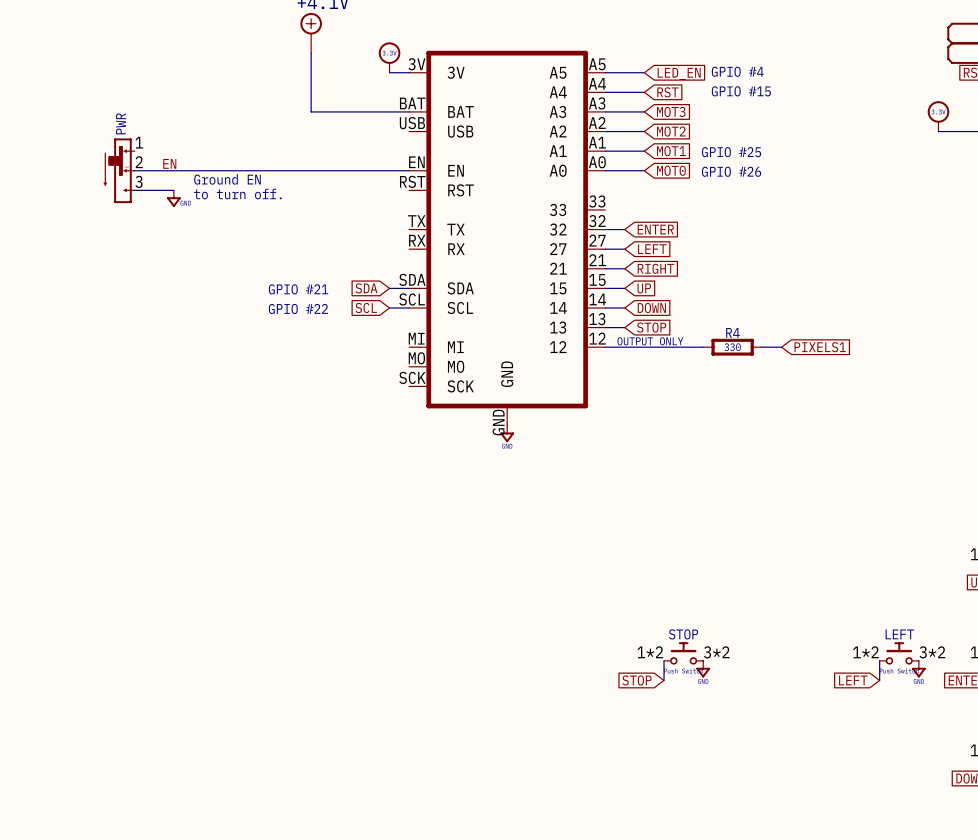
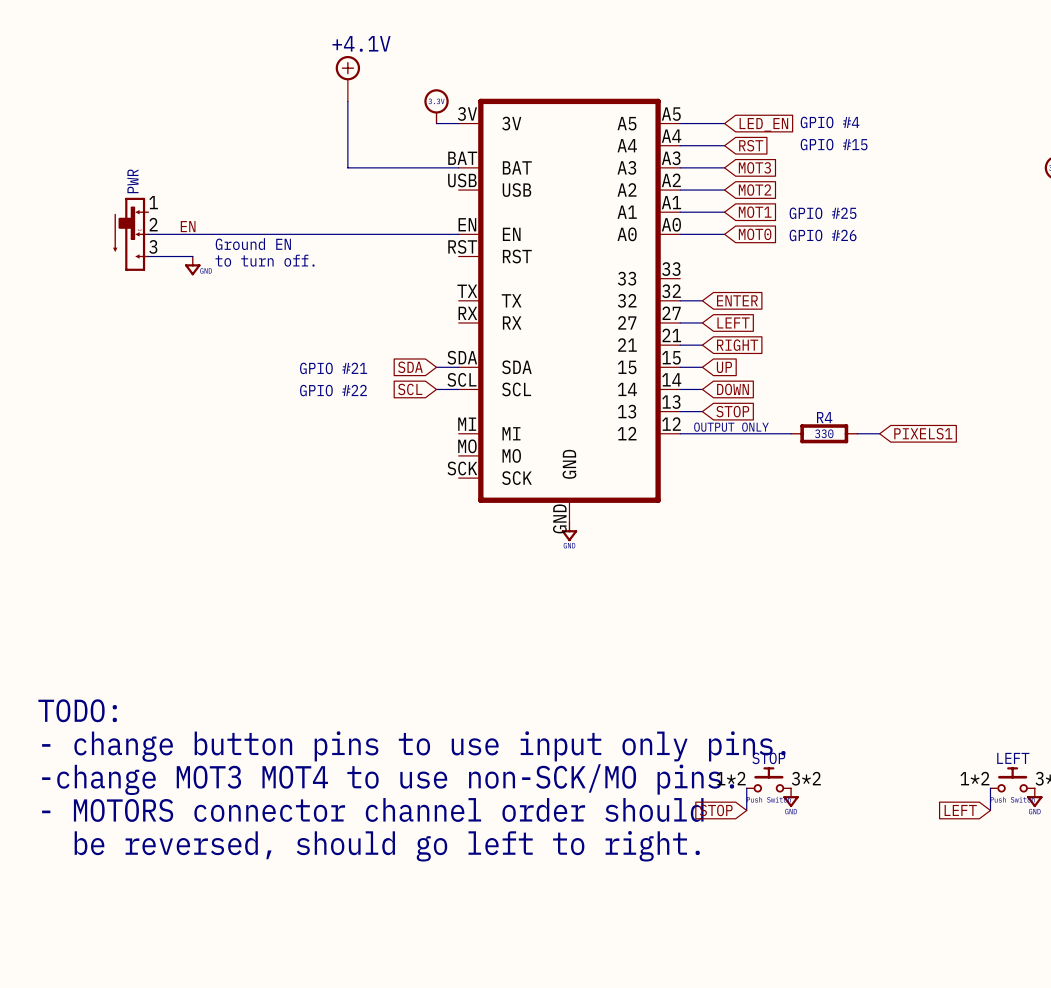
text: none -> TODO: (77, 710)
text: none -> - change button pins to use input only pins. (413, 746)
text: none -> -change MOT3 MOT4 to use non-SCK/MO pins. (388, 779)
text: none -> - MOTORS connector channel order should (372, 809)
text: none -> be reversed, should go left to right. (387, 846)

